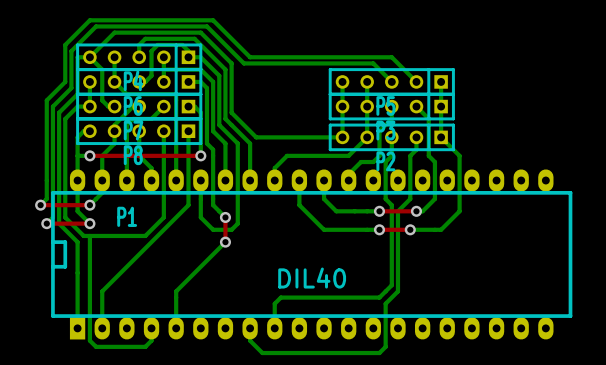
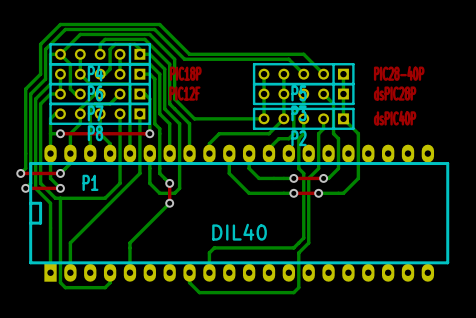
text: none -> PIC18P (185, 73)
text: none -> PIC28-40P (399, 73)
text: none -> PIC12F (184, 93)
text: none -> dsPIC28P (395, 93)
text: none -> dsPIC40P (395, 118)

